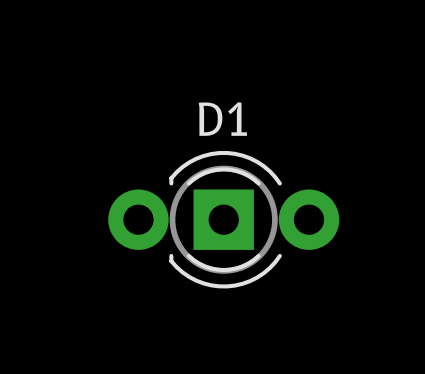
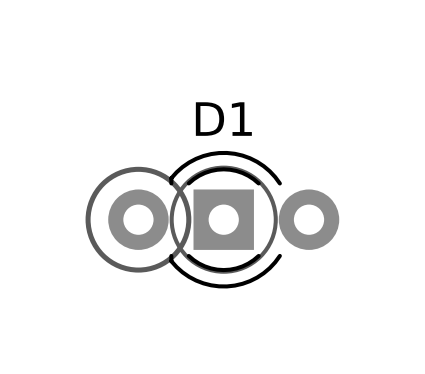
D1 footprint: [108, 150, 340, 289] -> [85, 150, 340, 289]

